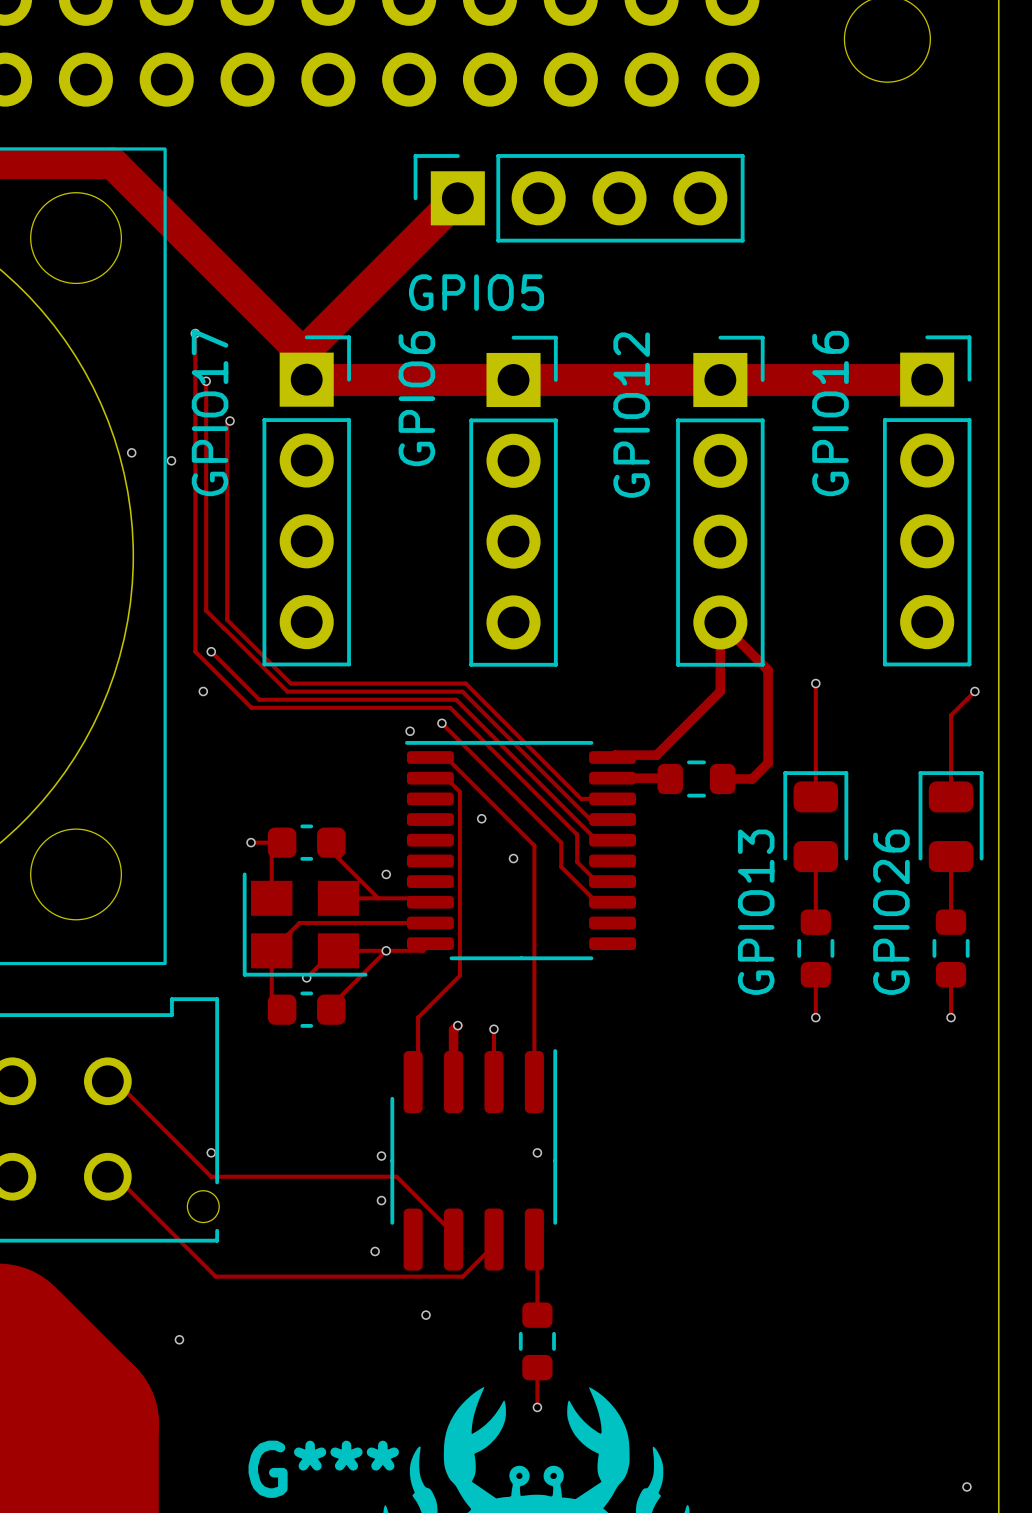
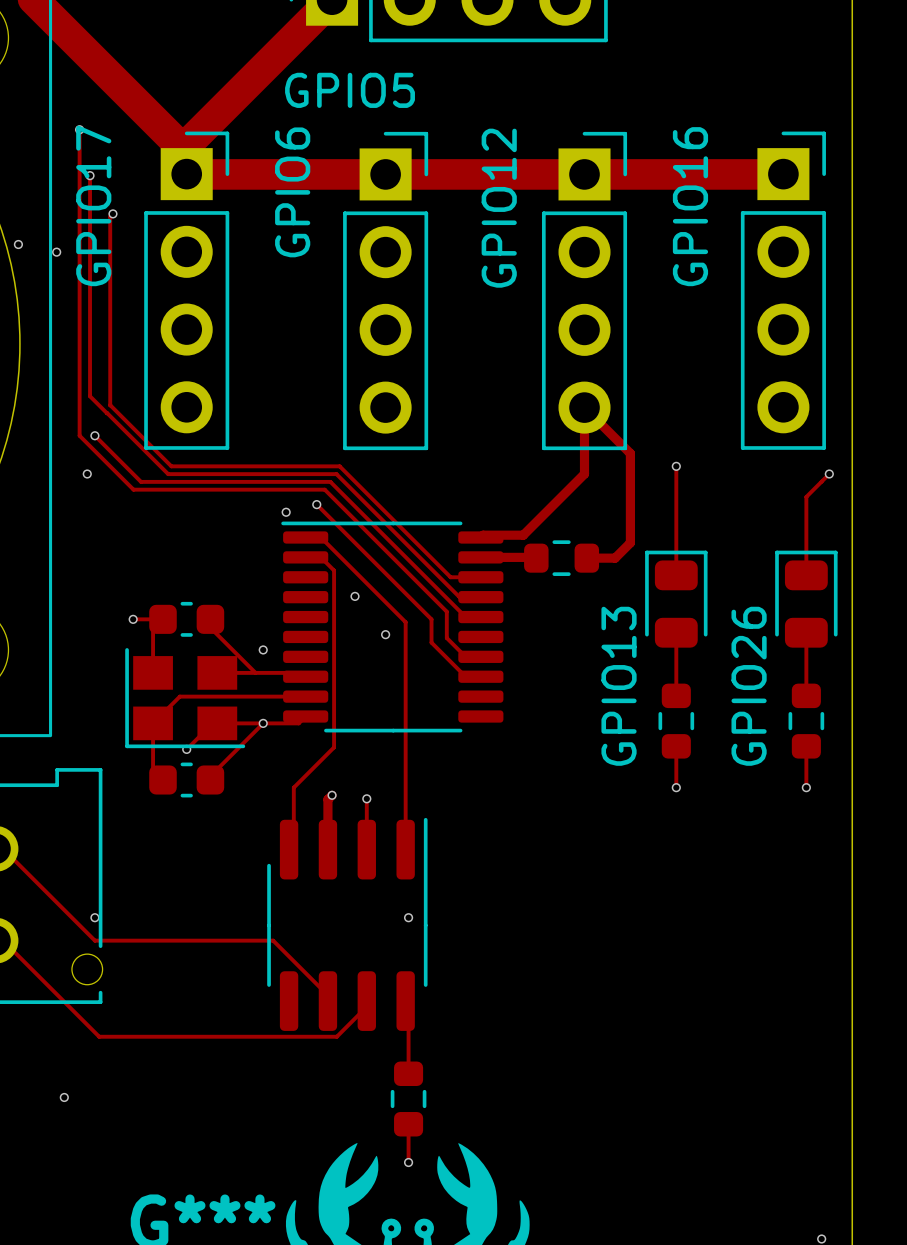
via: (381, 1156) -> none
via: (381, 1200) -> none
via: (375, 1251) -> none
via: (426, 1315) -> none

